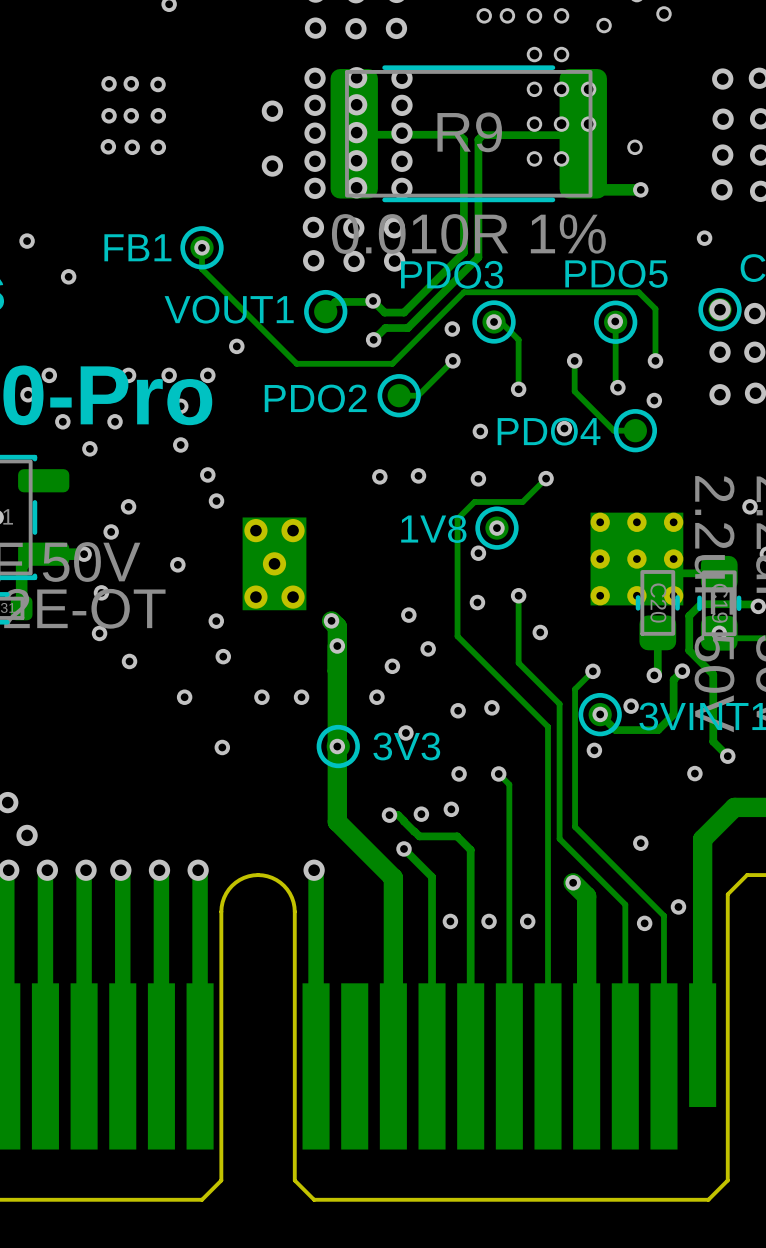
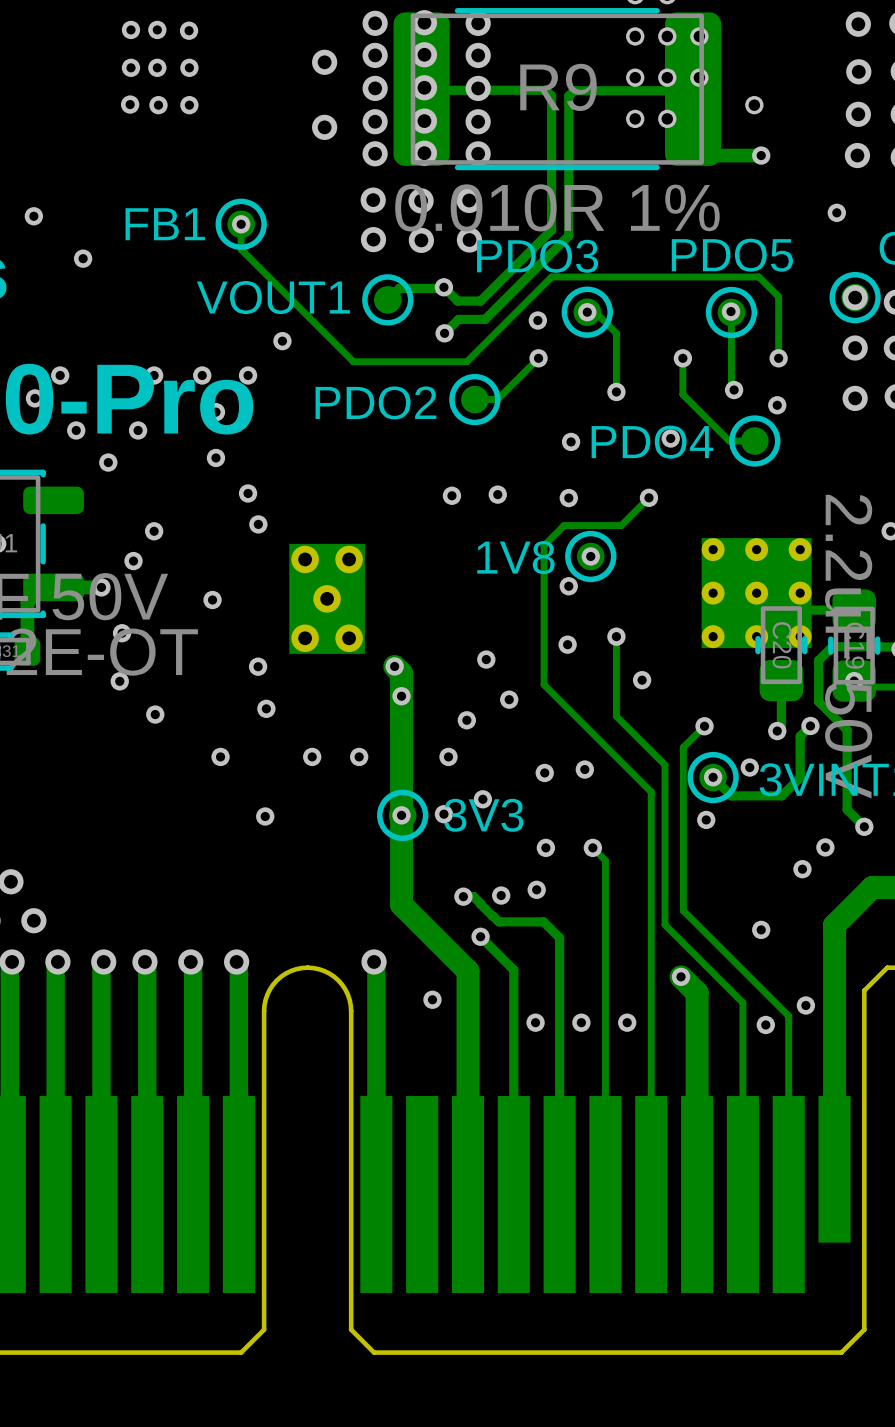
via: none -> (443, 814)
via: none -> (802, 869)
via: none -> (432, 999)

